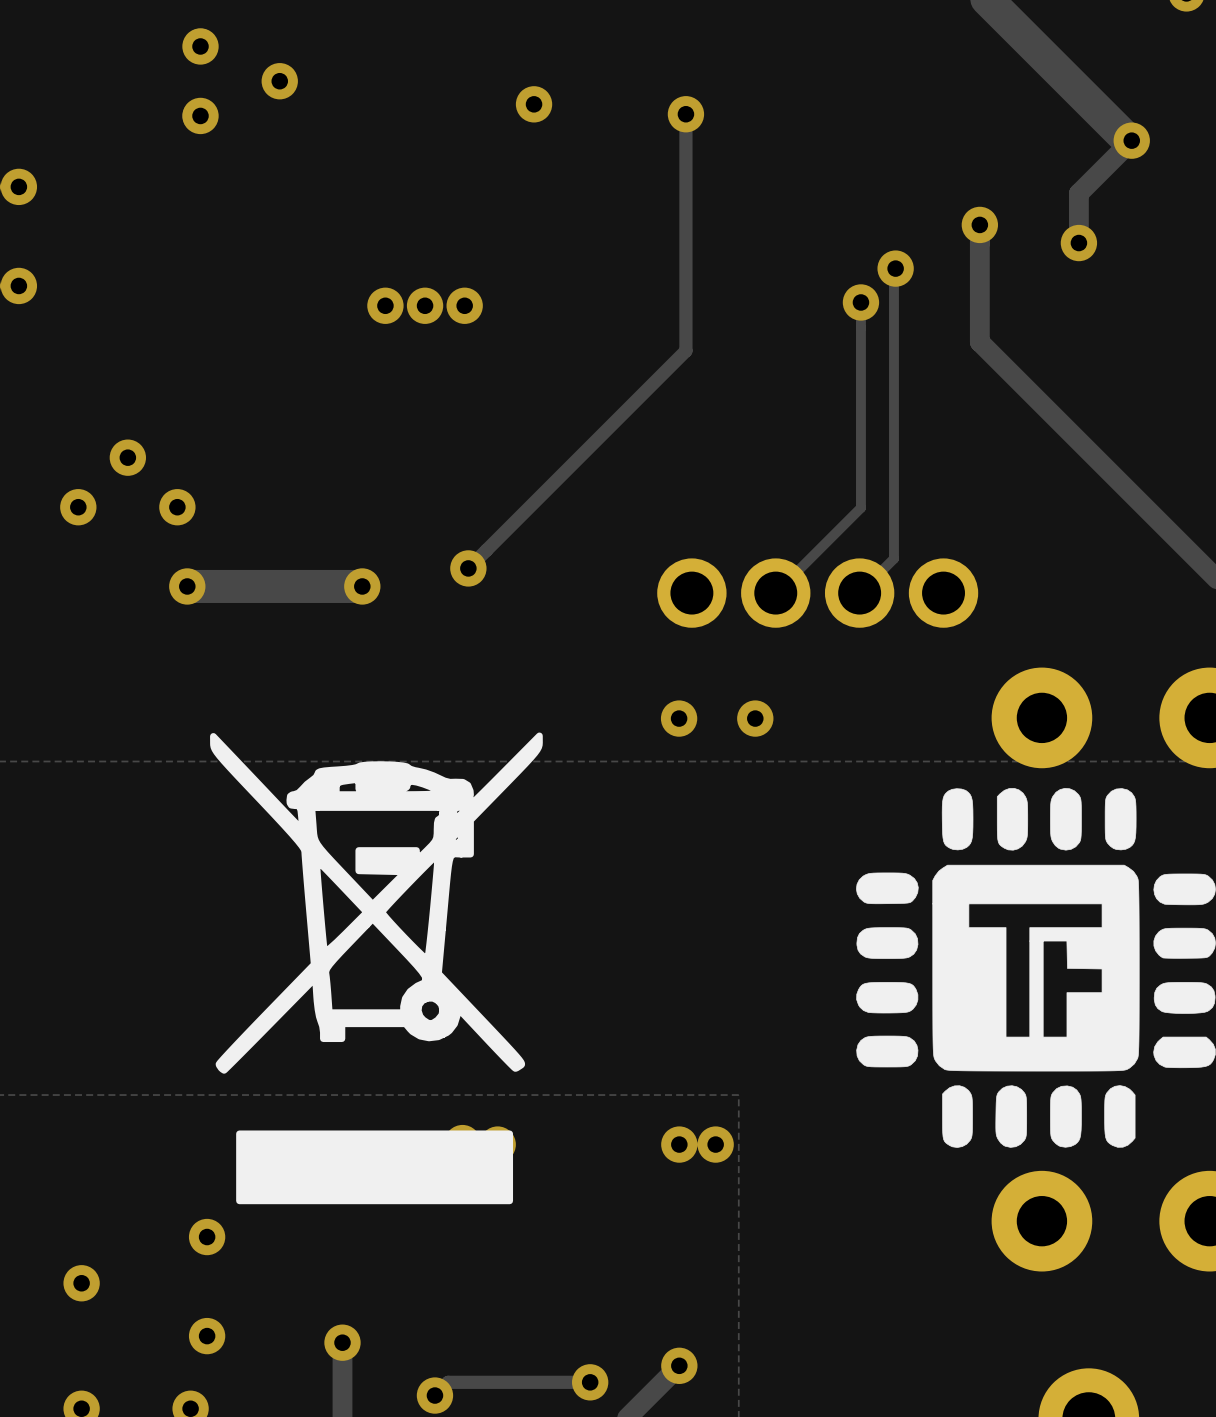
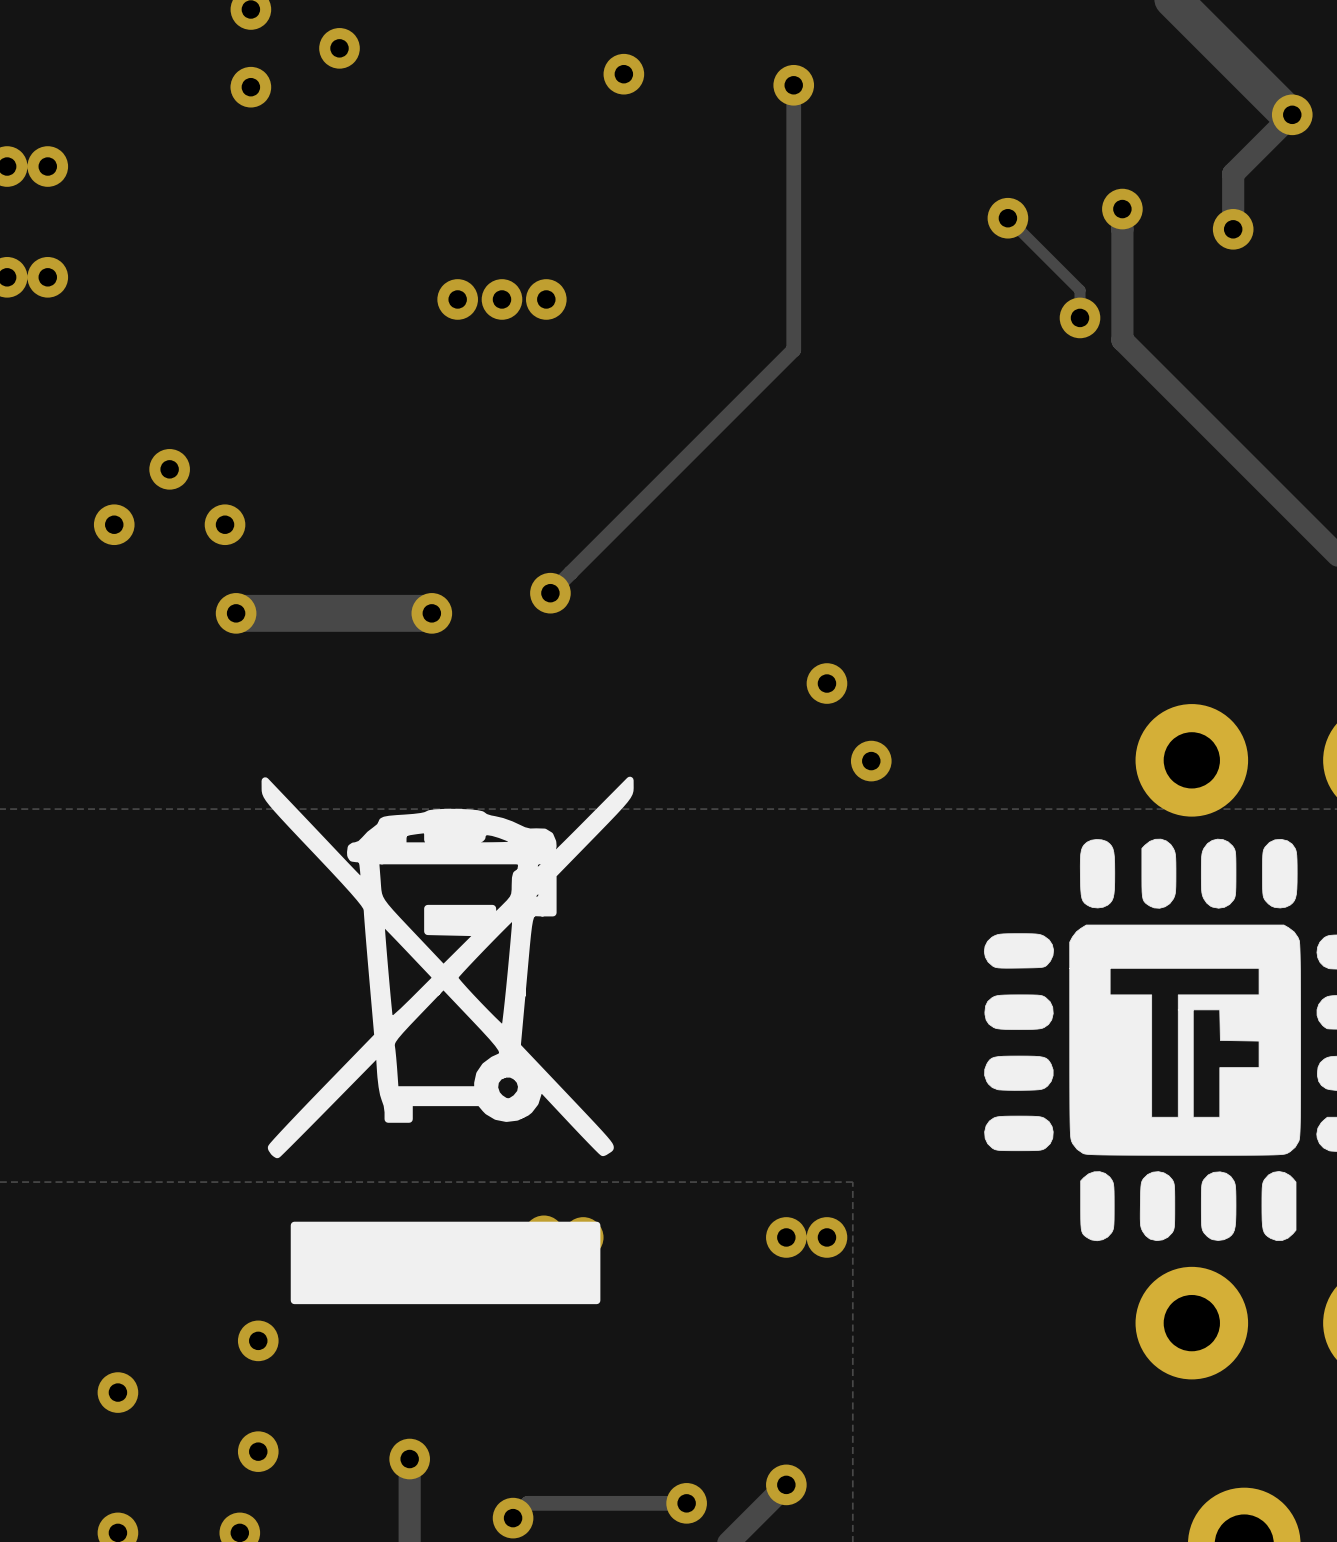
track: none -> (1007, 218) (1080, 290) (1080, 317)
track: (895, 268) (893, 270) (893, 558) (859, 593) -> none
via position: (895, 268) -> (1007, 218)
track: (860, 302) (860, 507) (775, 593) -> none
via: (860, 302) -> none
via: none -> (1080, 317)
part: (817, 593) -> none
via position: (679, 718) -> (826, 683)

